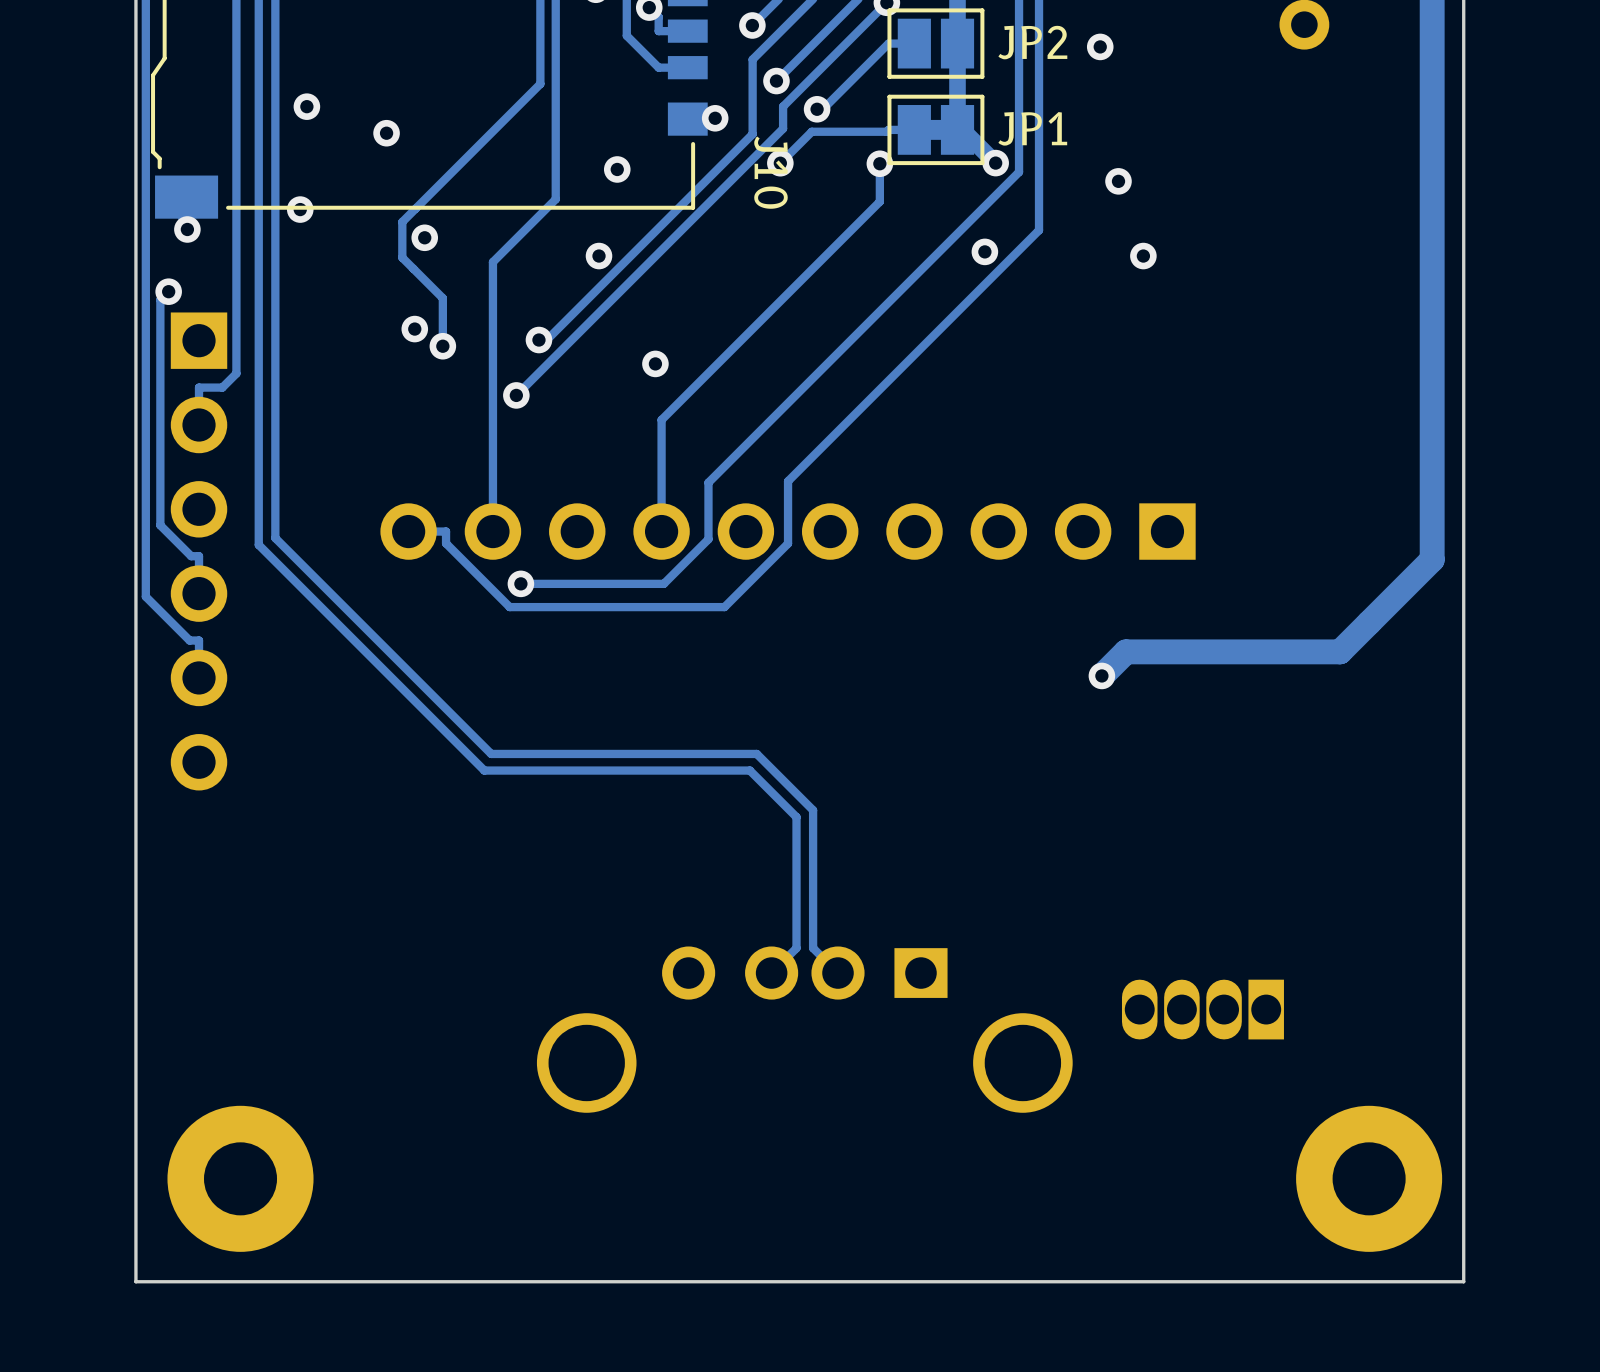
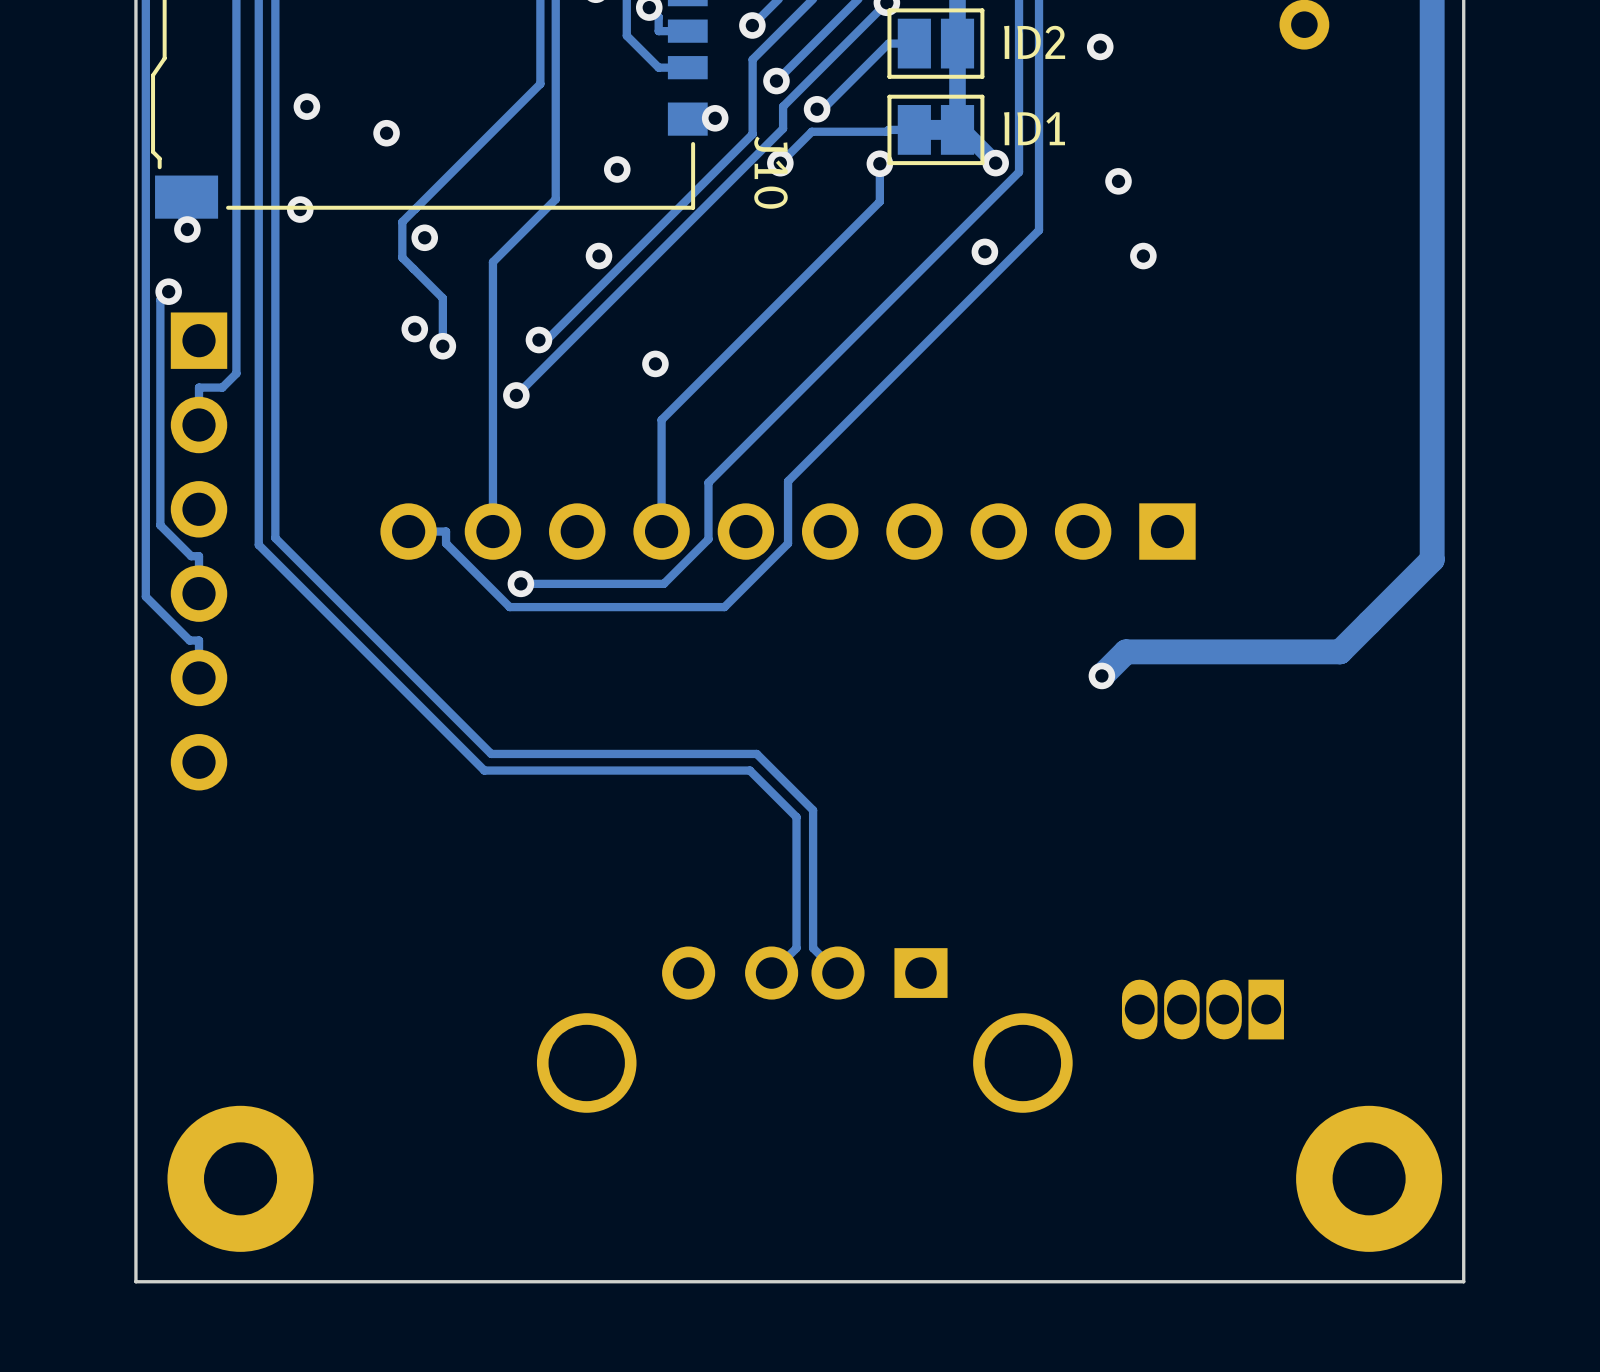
JP2 name: JP2 (1032, 42) -> ID2 (1034, 42)
JP1 name: JP1 (1032, 128) -> ID1 (1034, 128)

